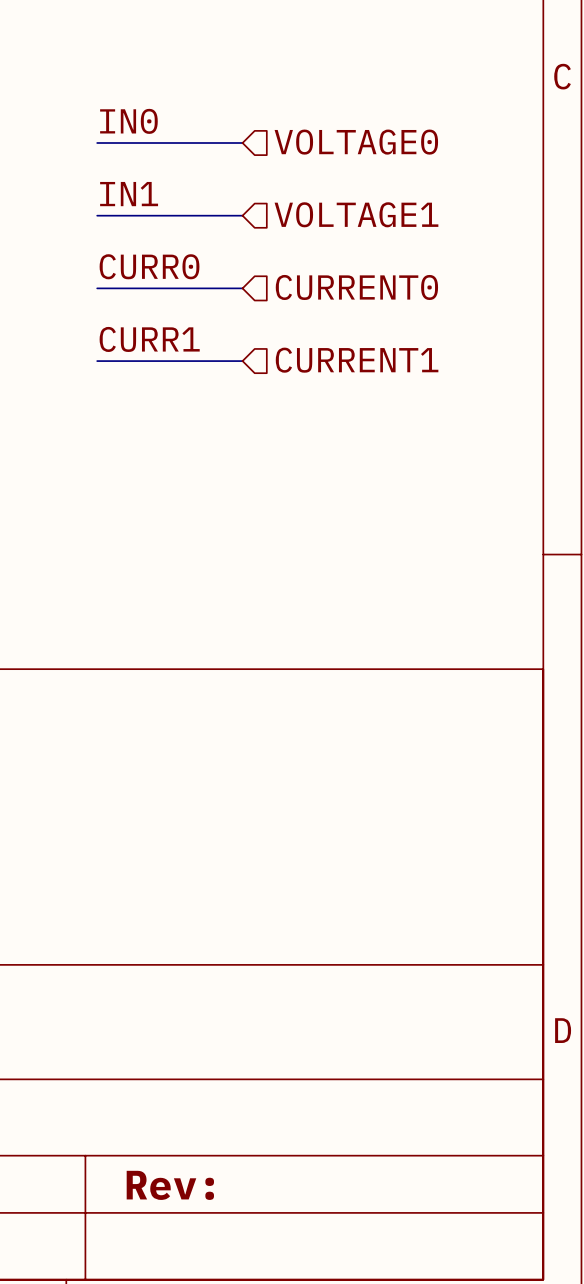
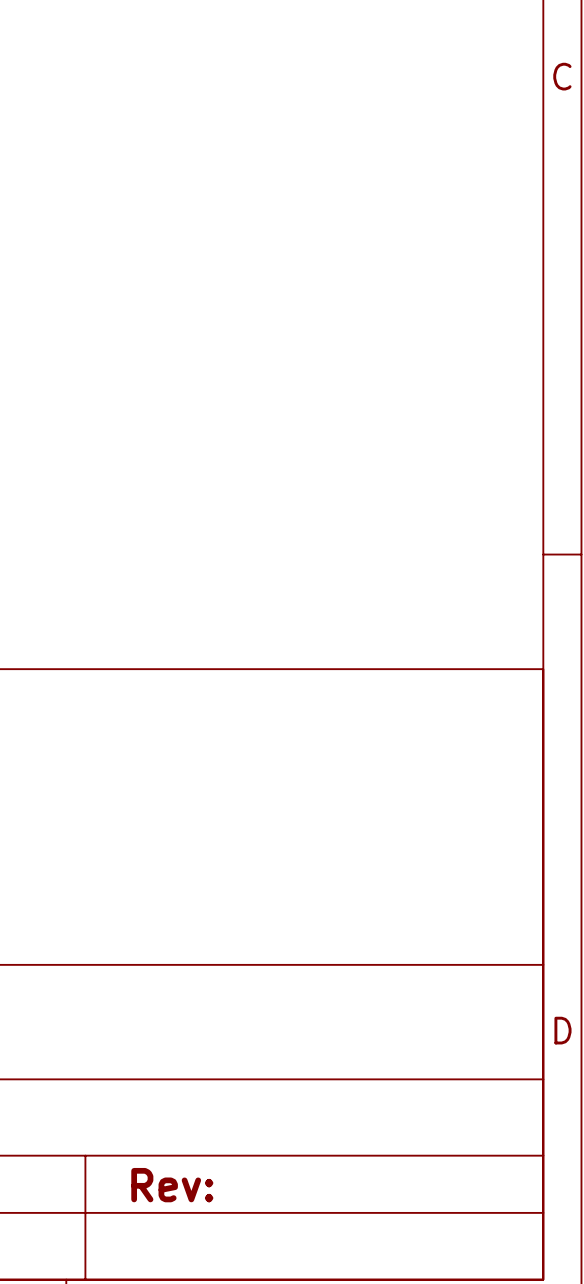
label: IN0 (128, 121) -> none
wire: (97, 142) (242, 142) -> none
hierarchical label: VOLTAGE0 (356, 142) -> none
label: IN1 (129, 194) -> none
hierarchical label: VOLTAGE1 (356, 214) -> none
wire: (97, 215) (242, 215) -> none
label: CURR0 (149, 266) -> none
hierarchical label: CURRENT0 (356, 287) -> none
wire: (97, 288) (242, 288) -> none
label: CURR1 (149, 339) -> none
hierarchical label: CURRENT1 (357, 360) -> none
wire: (97, 361) (242, 361) -> none

